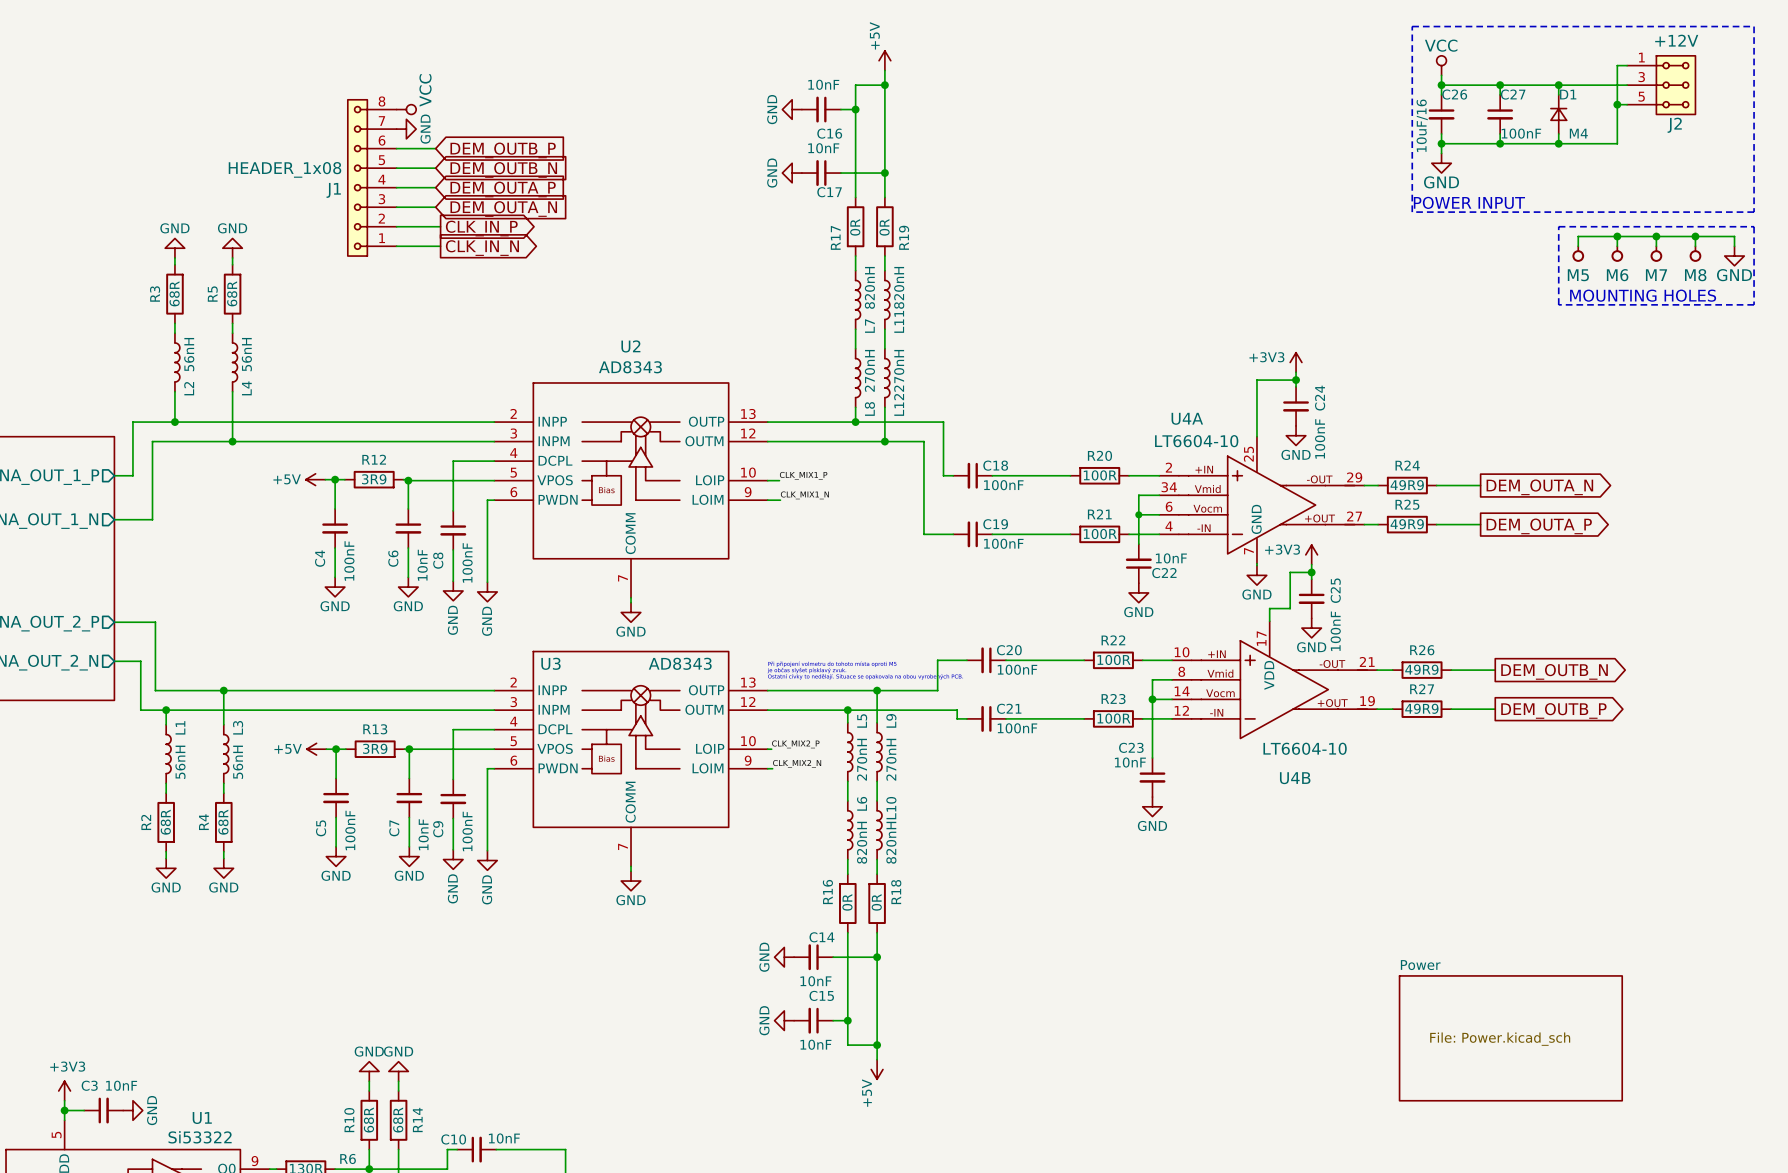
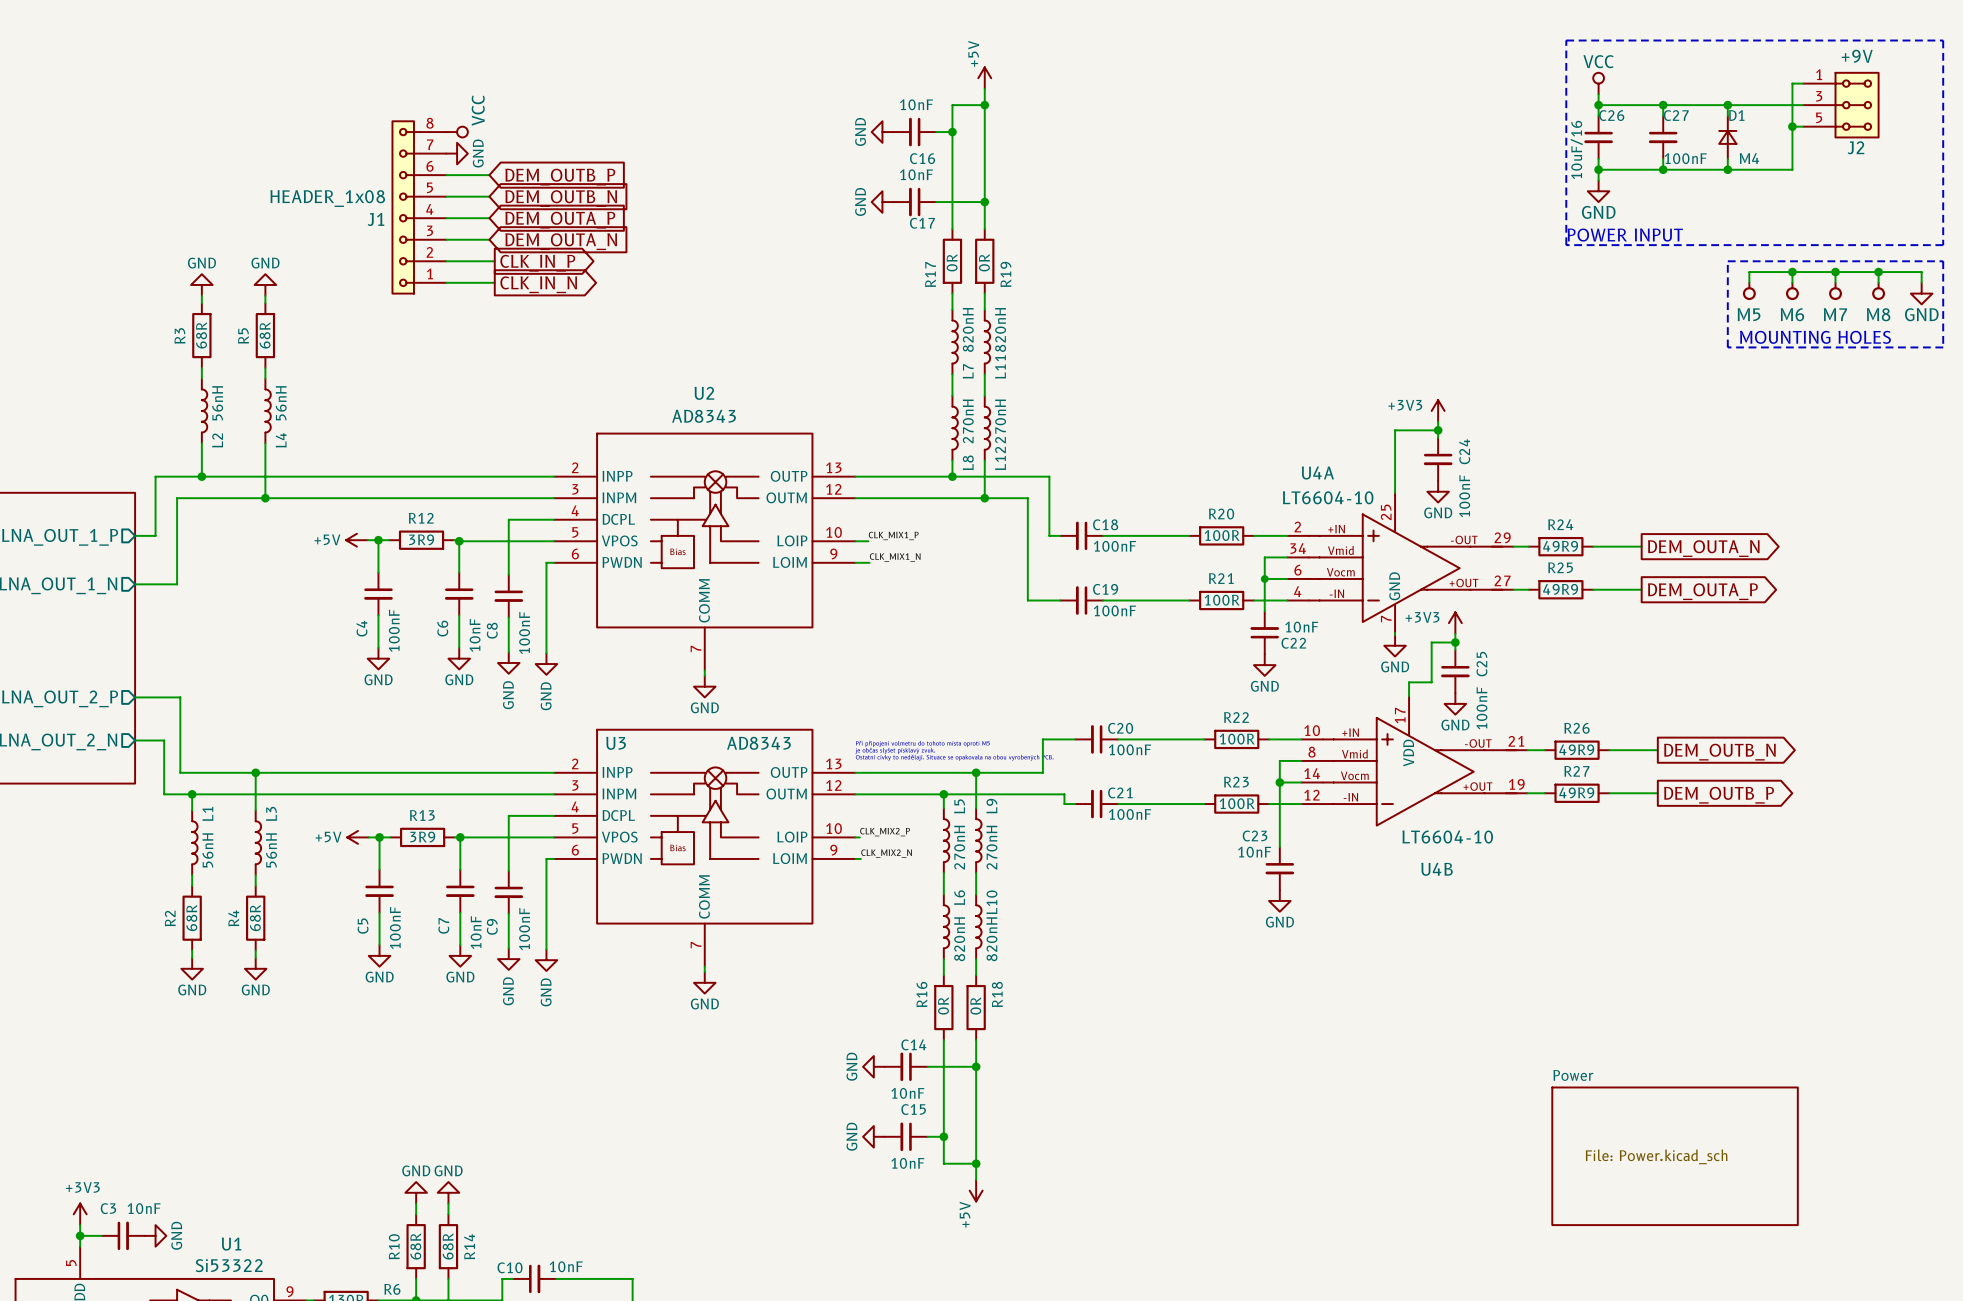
J2 value: +12V (1676, 40) -> +9V (1857, 56)

